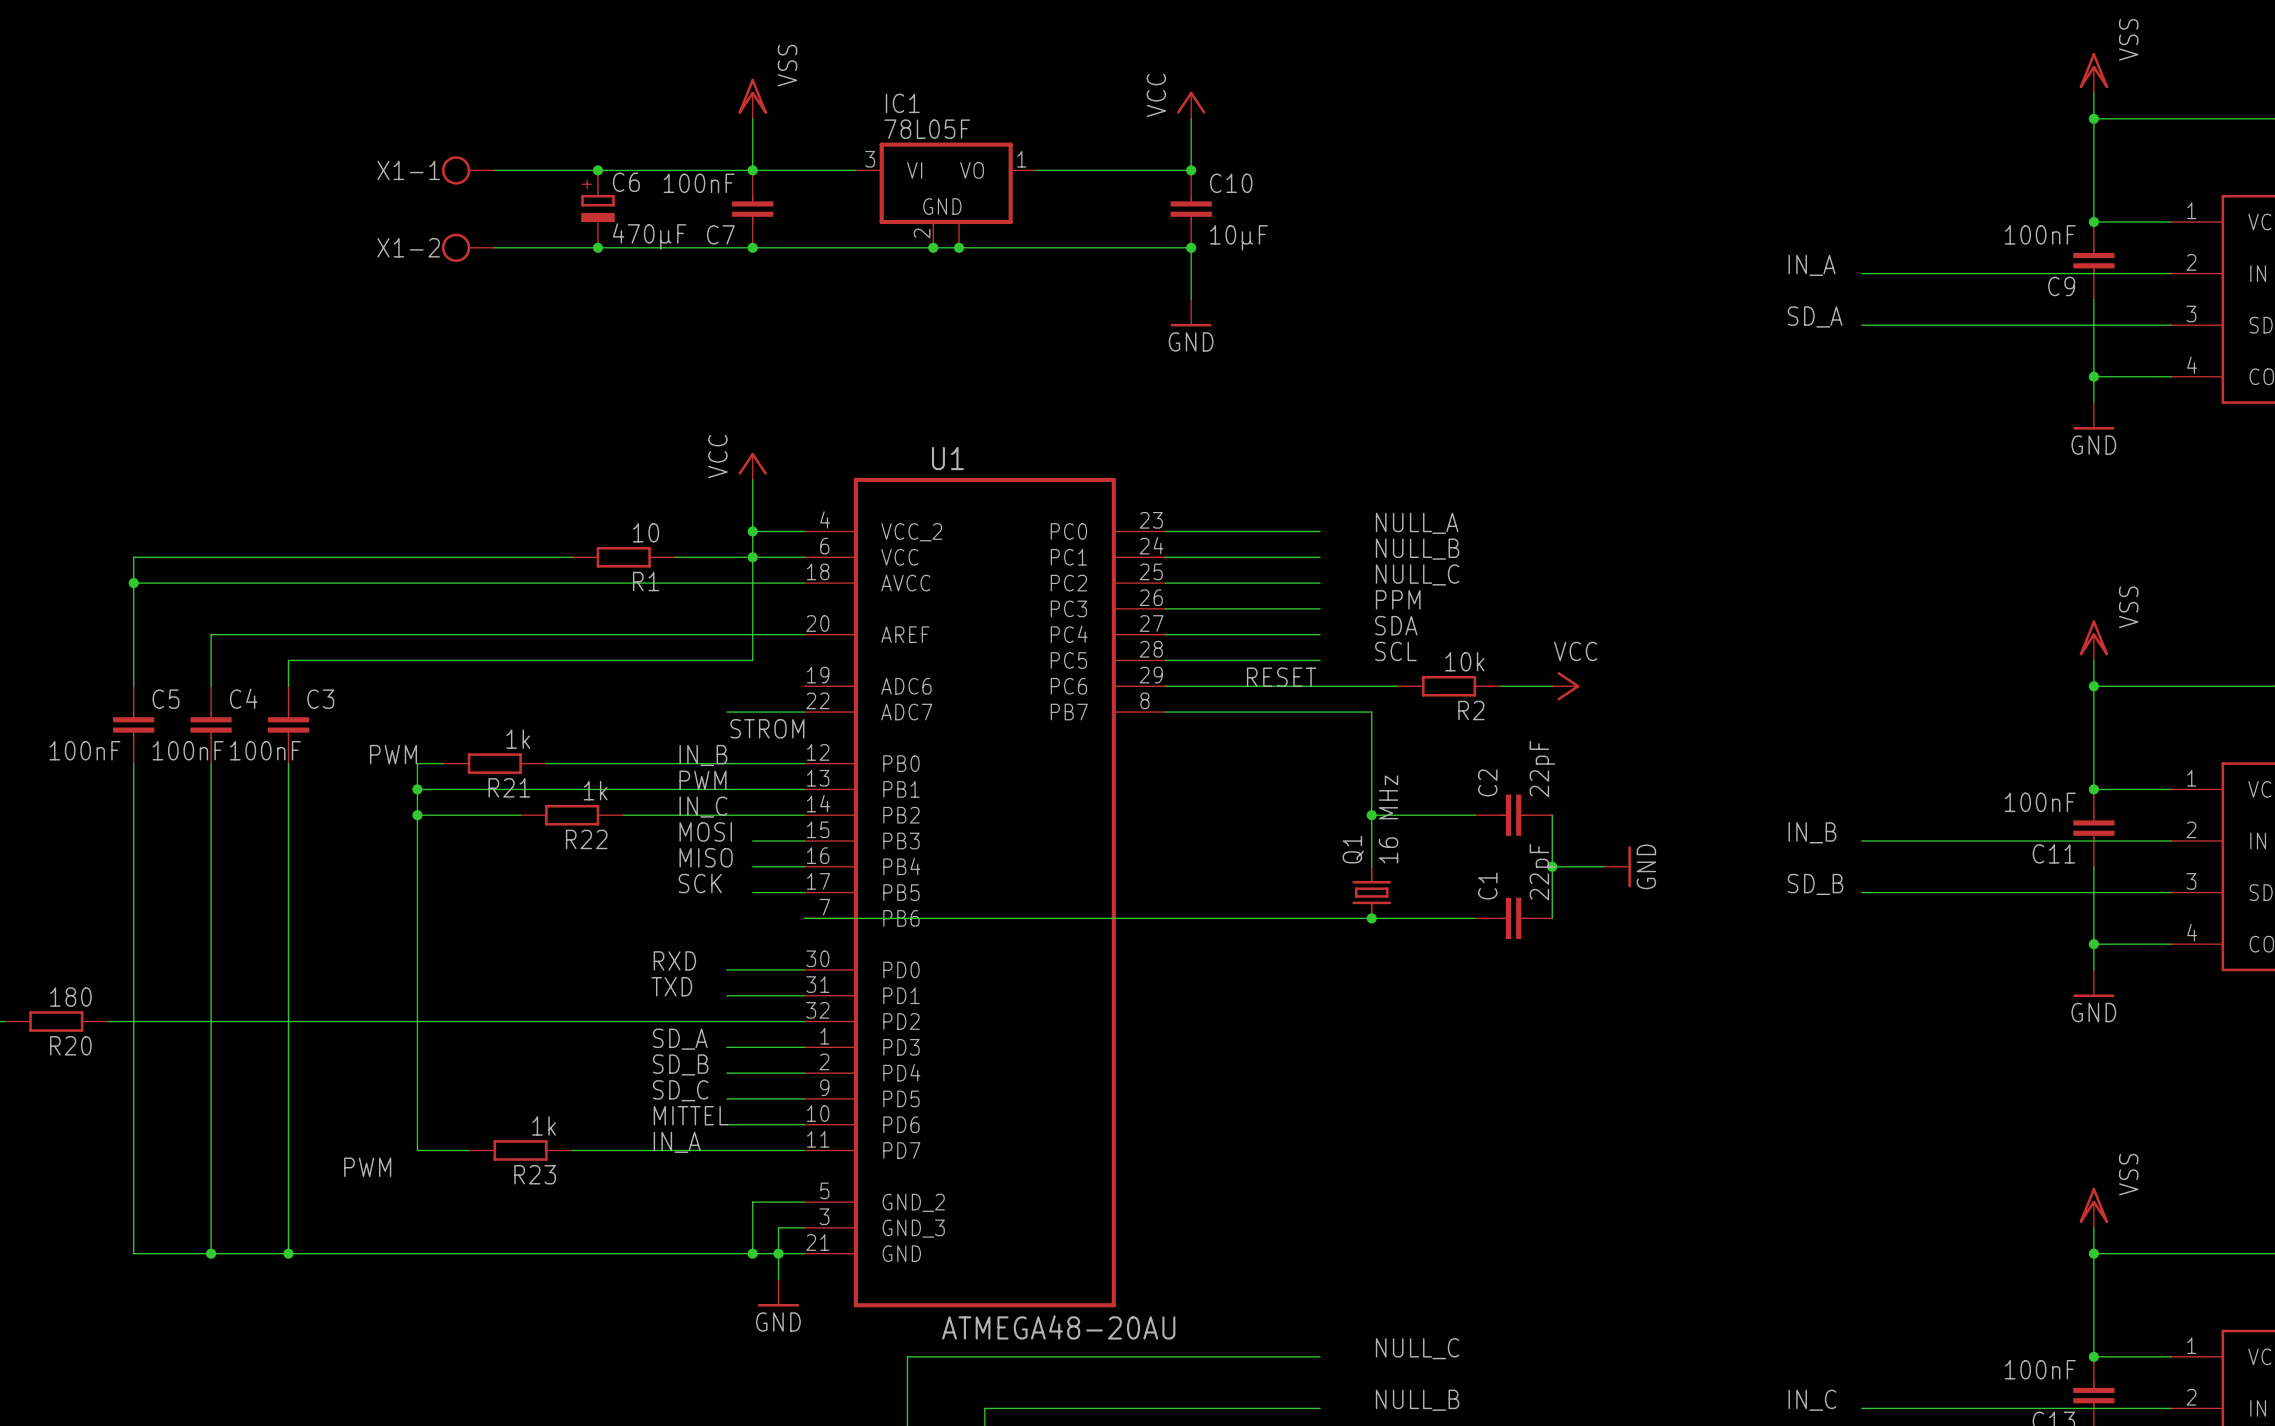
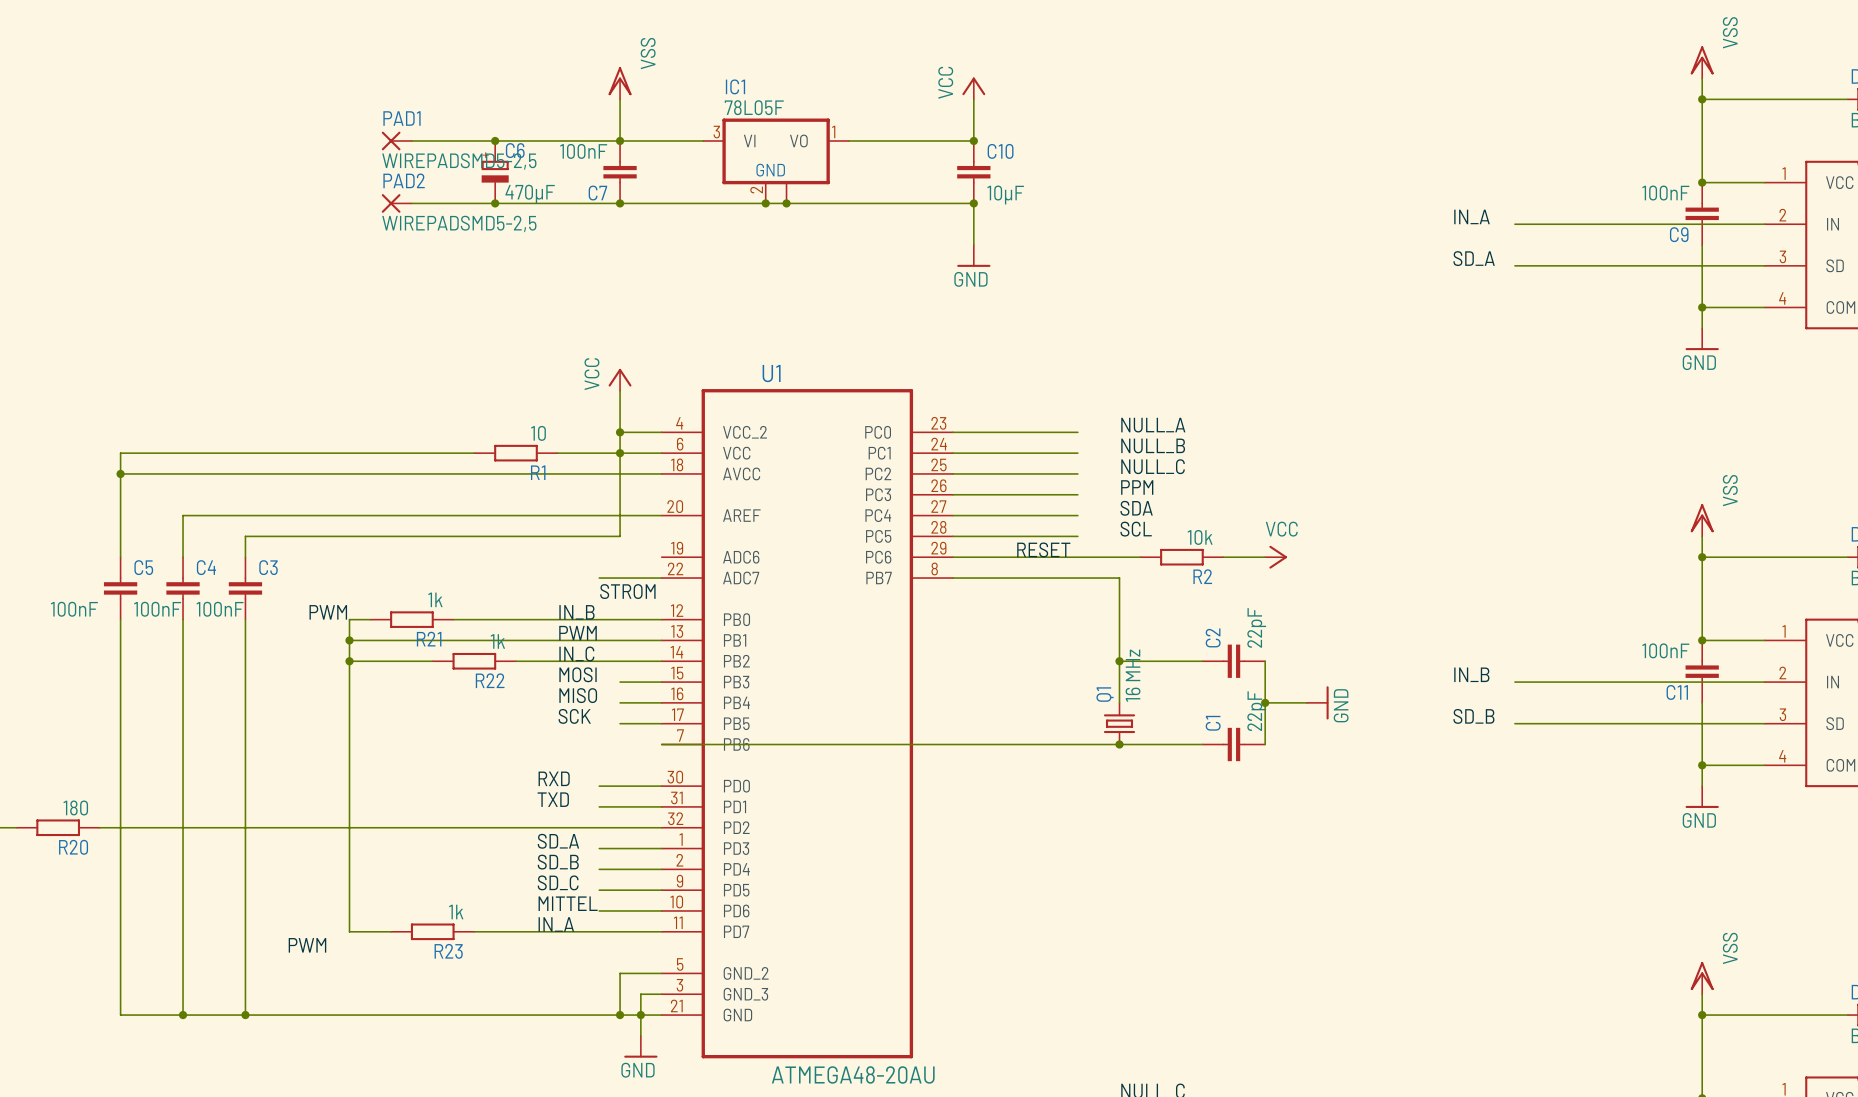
X1-1: (468, 170) -> none
PAD1: none -> WIREPADSMD5-2,5 (396, 140)
X1-2: (468, 247) -> none
PAD2: none -> WIREPADSMD5-2,5 (396, 203)

